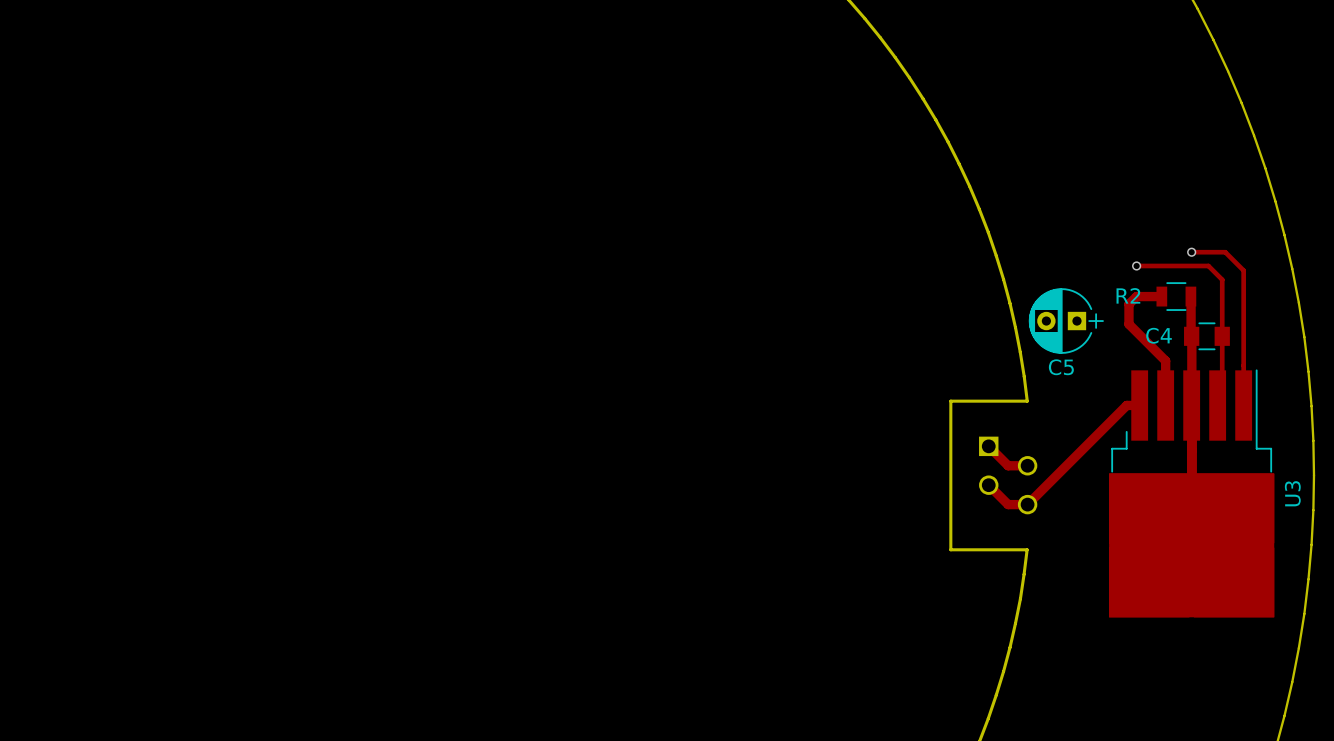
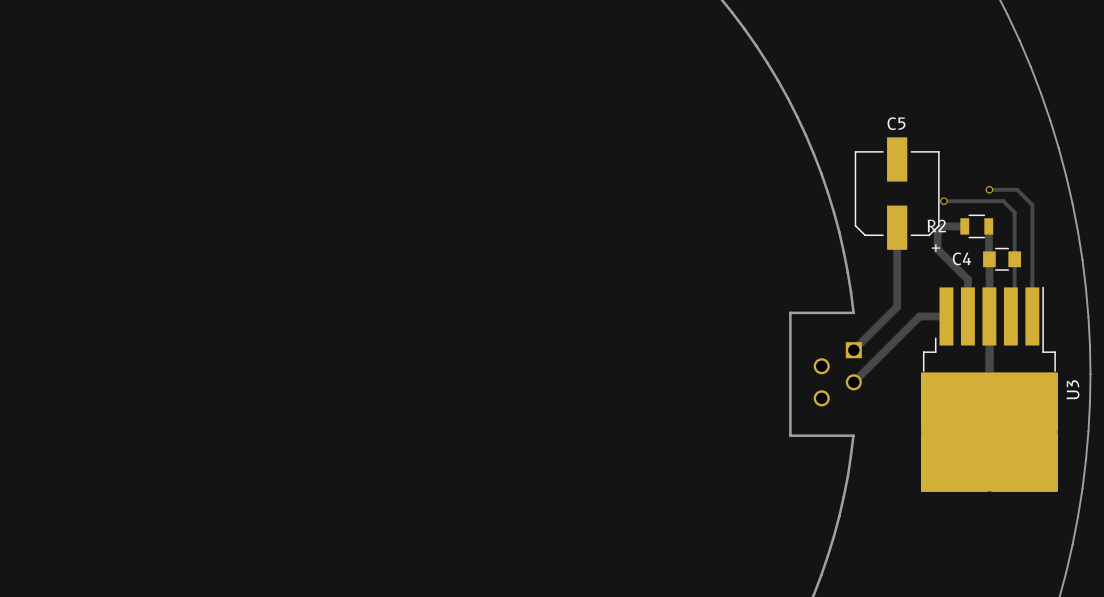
C5 footprint: [1028, 288, 1104, 354] -> [854, 137, 940, 250]
track: none -> (897, 227) (897, 306) (853, 350)
C5 name position: C5 (1061, 367) -> C5 (896, 123)
track: (1126, 405) (1027, 504) (1008, 504) (988, 485) -> (935, 316) (919, 316) (853, 382)
part footprint: [979, 436, 1038, 515] -> [813, 342, 862, 407]
track: (988, 446) (1008, 465) (1027, 465) -> none

